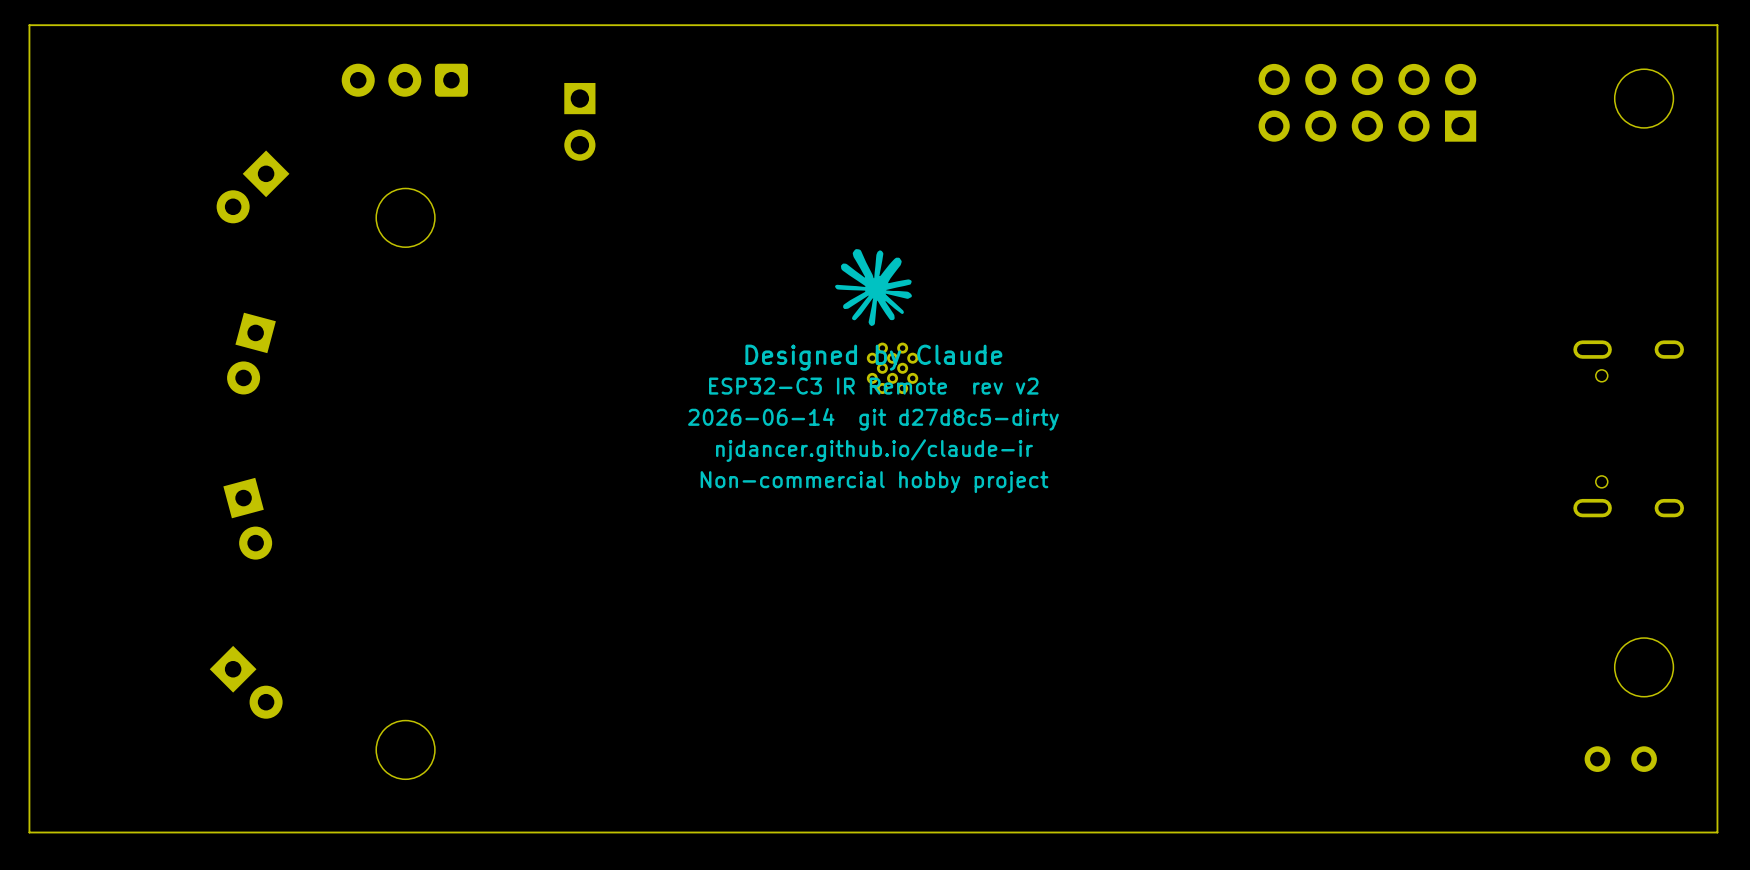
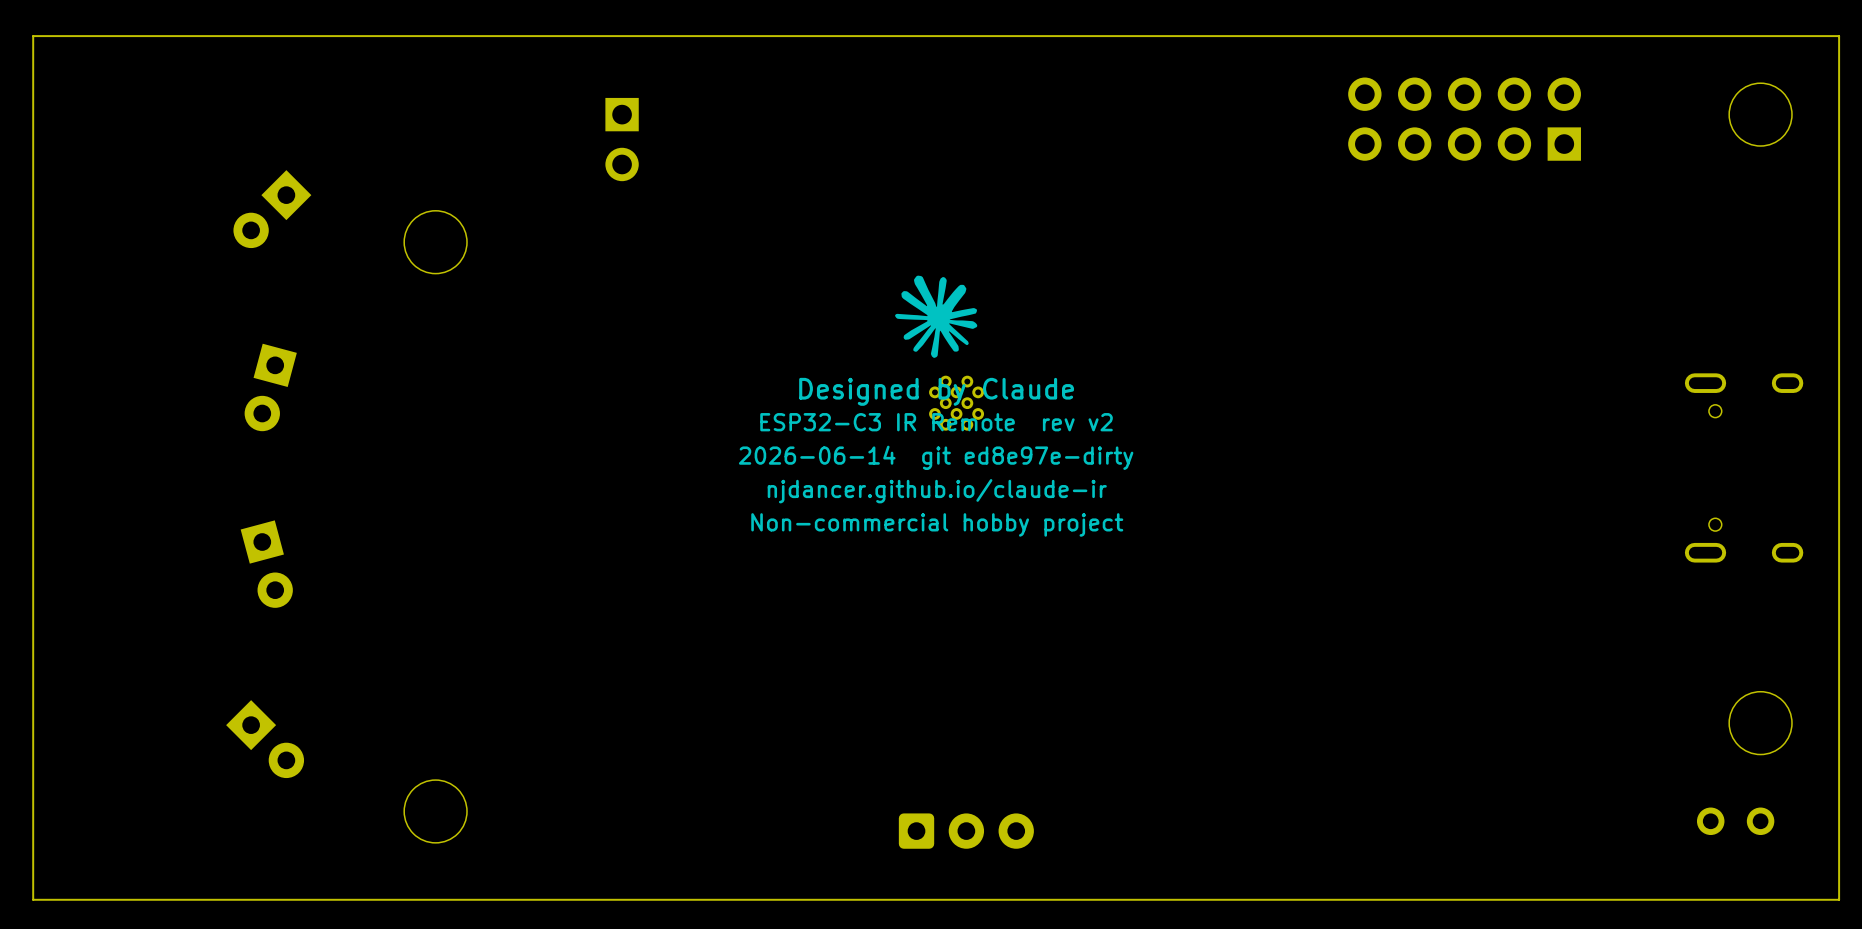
part: (404, 80) -> none
text: 2026-06-14 git d27d8c5-dirty (873, 419) -> 2026-06-14 git ed8e97e-dirty (936, 457)
part: none -> (966, 831)

